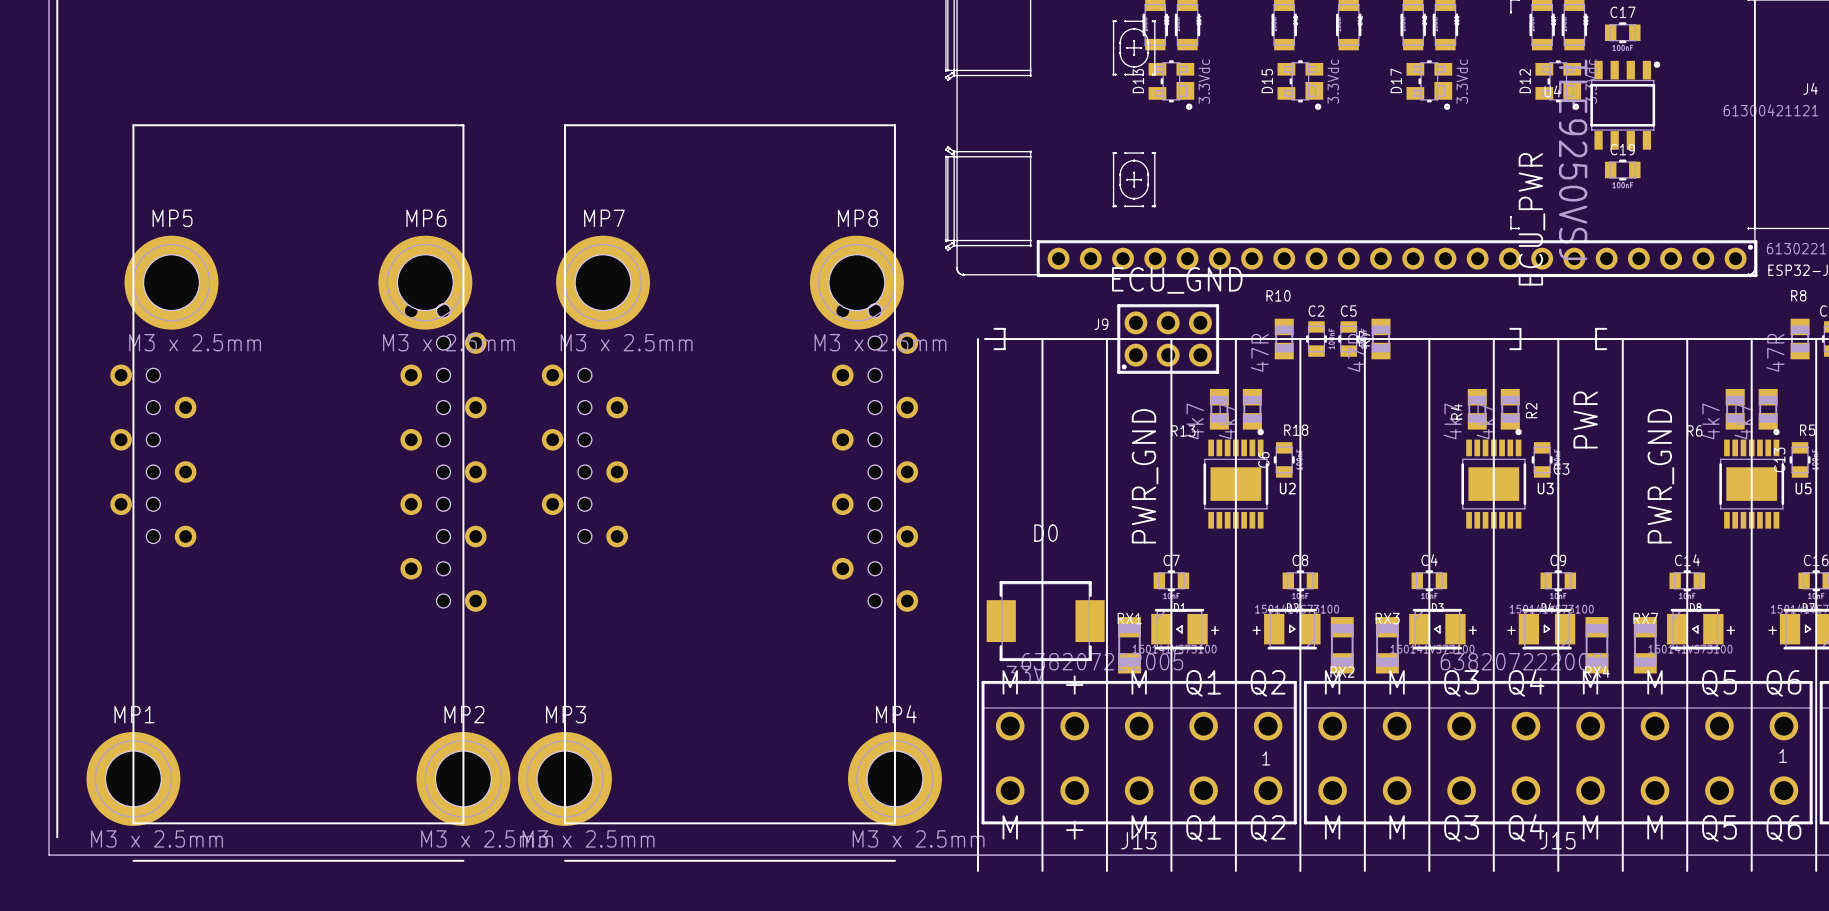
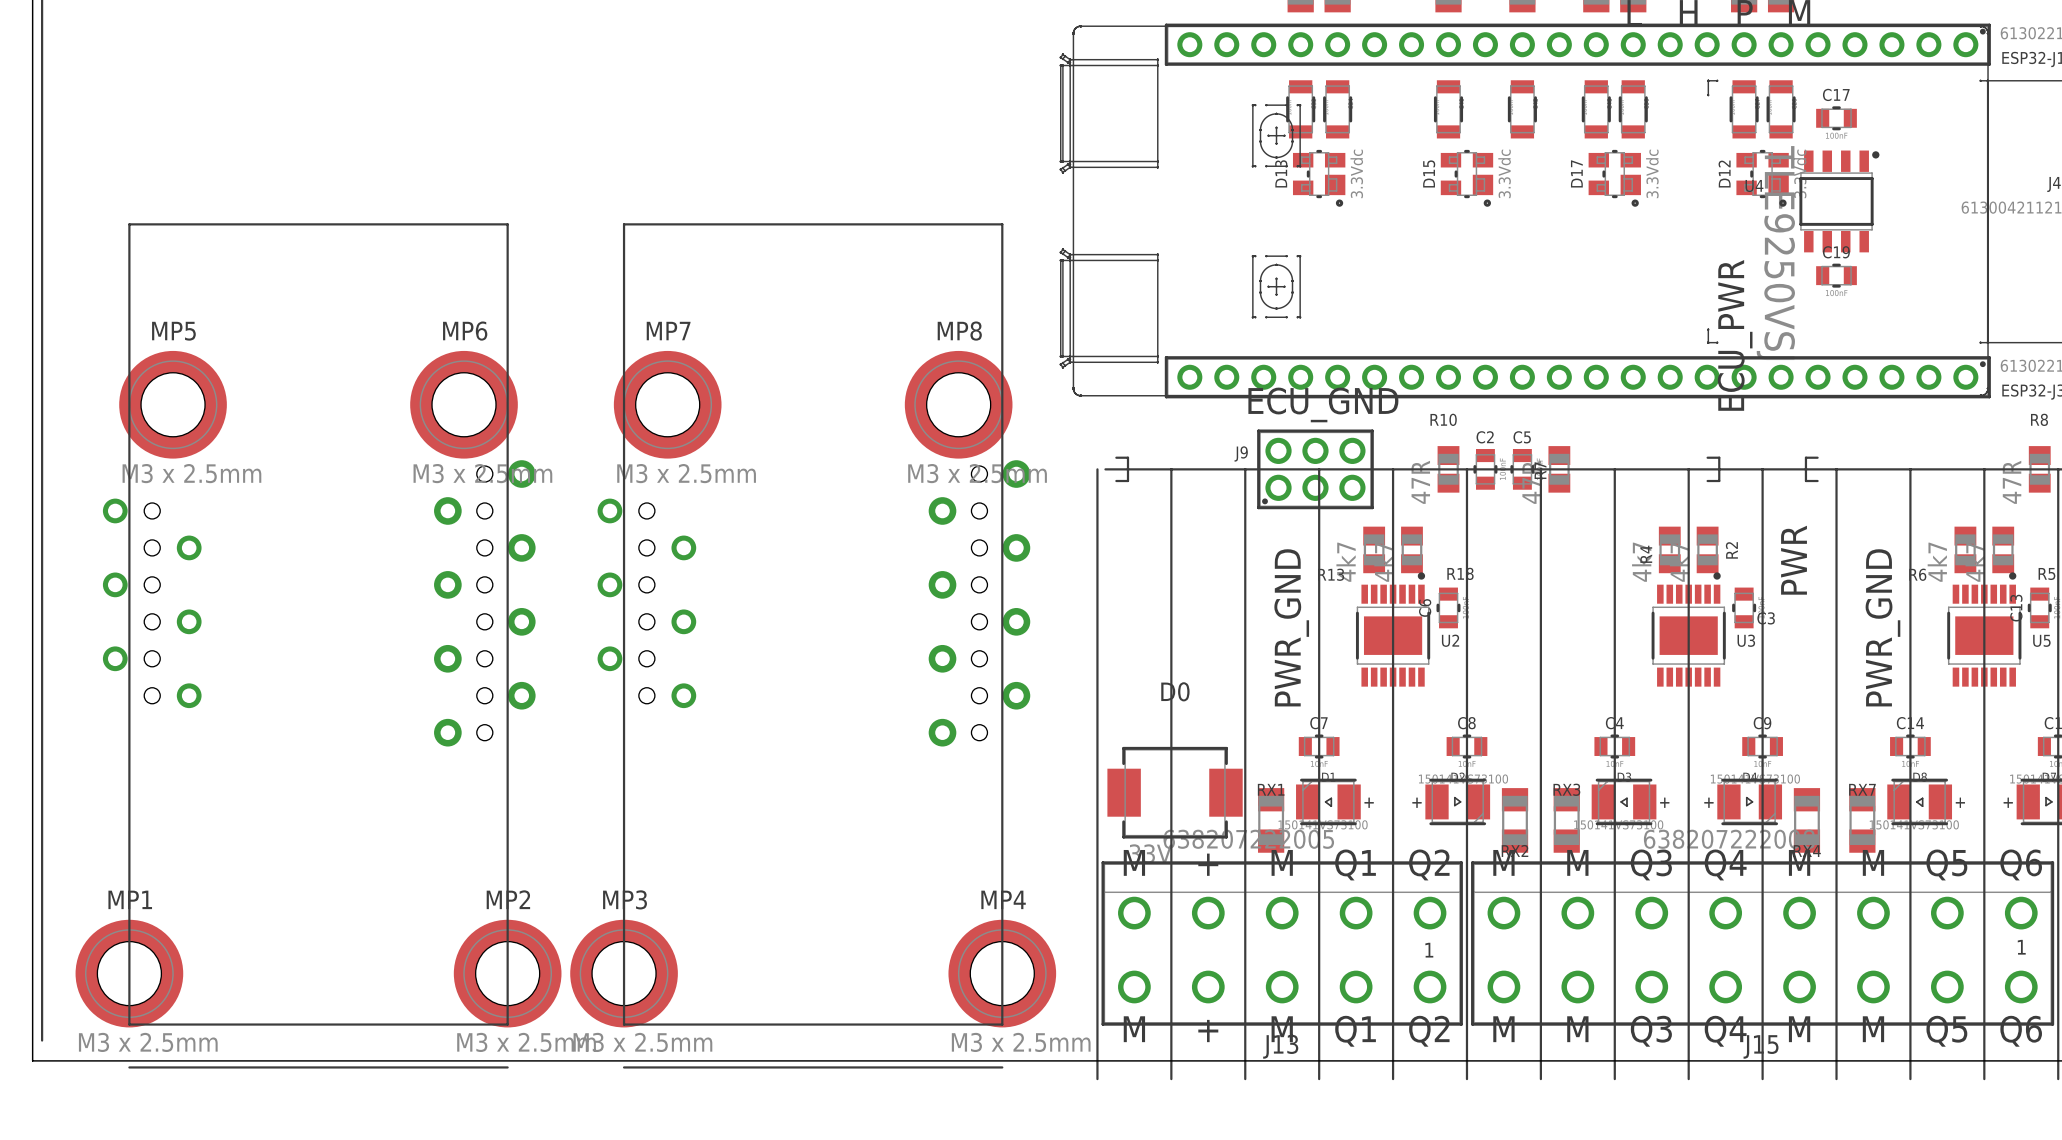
part footprint: [400, 300, 487, 612] -> [434, 460, 536, 747]
part footprint: [832, 300, 919, 612] -> [928, 460, 1031, 747]

